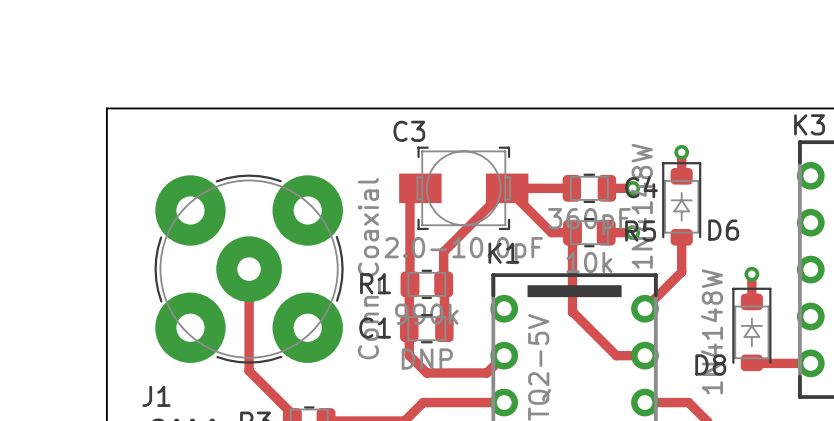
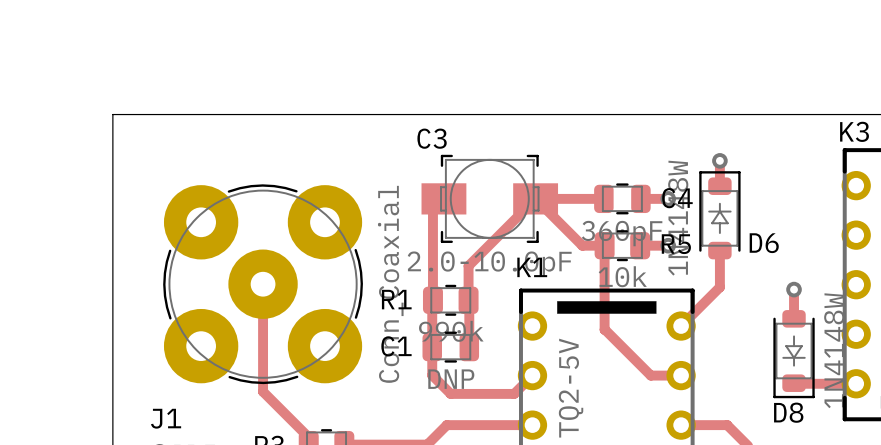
D8 rotation: 0° (751, 329) -> 180° (794, 354)
D8 name position: D8 (710, 364) -> D8 (788, 412)

